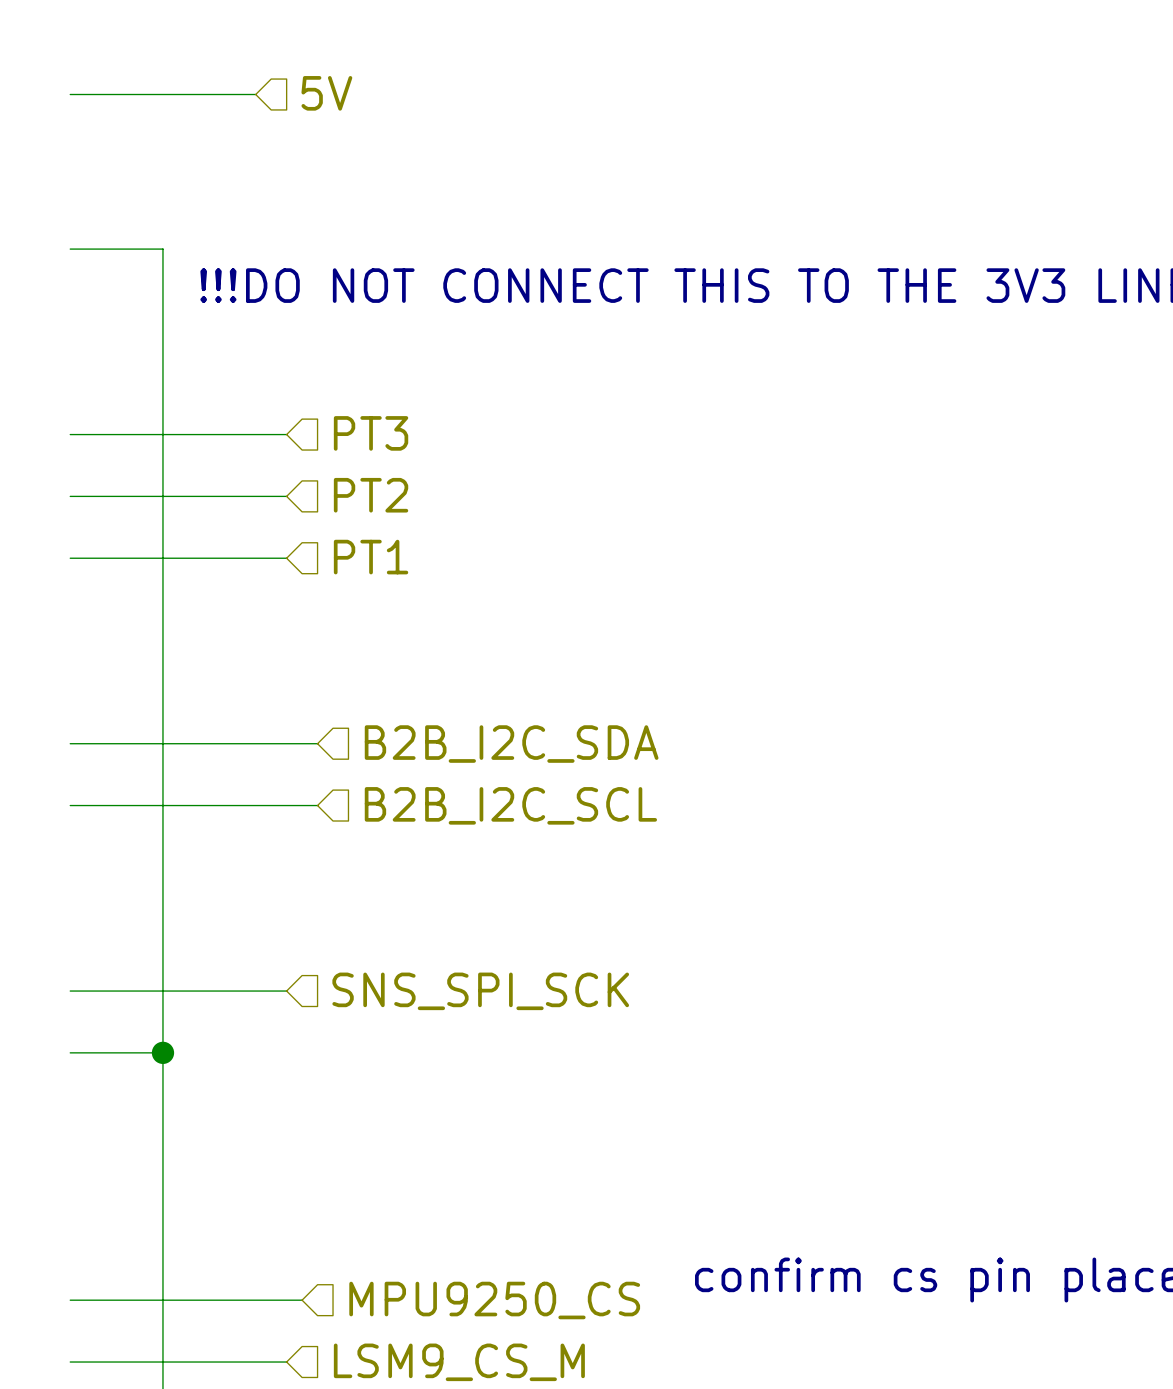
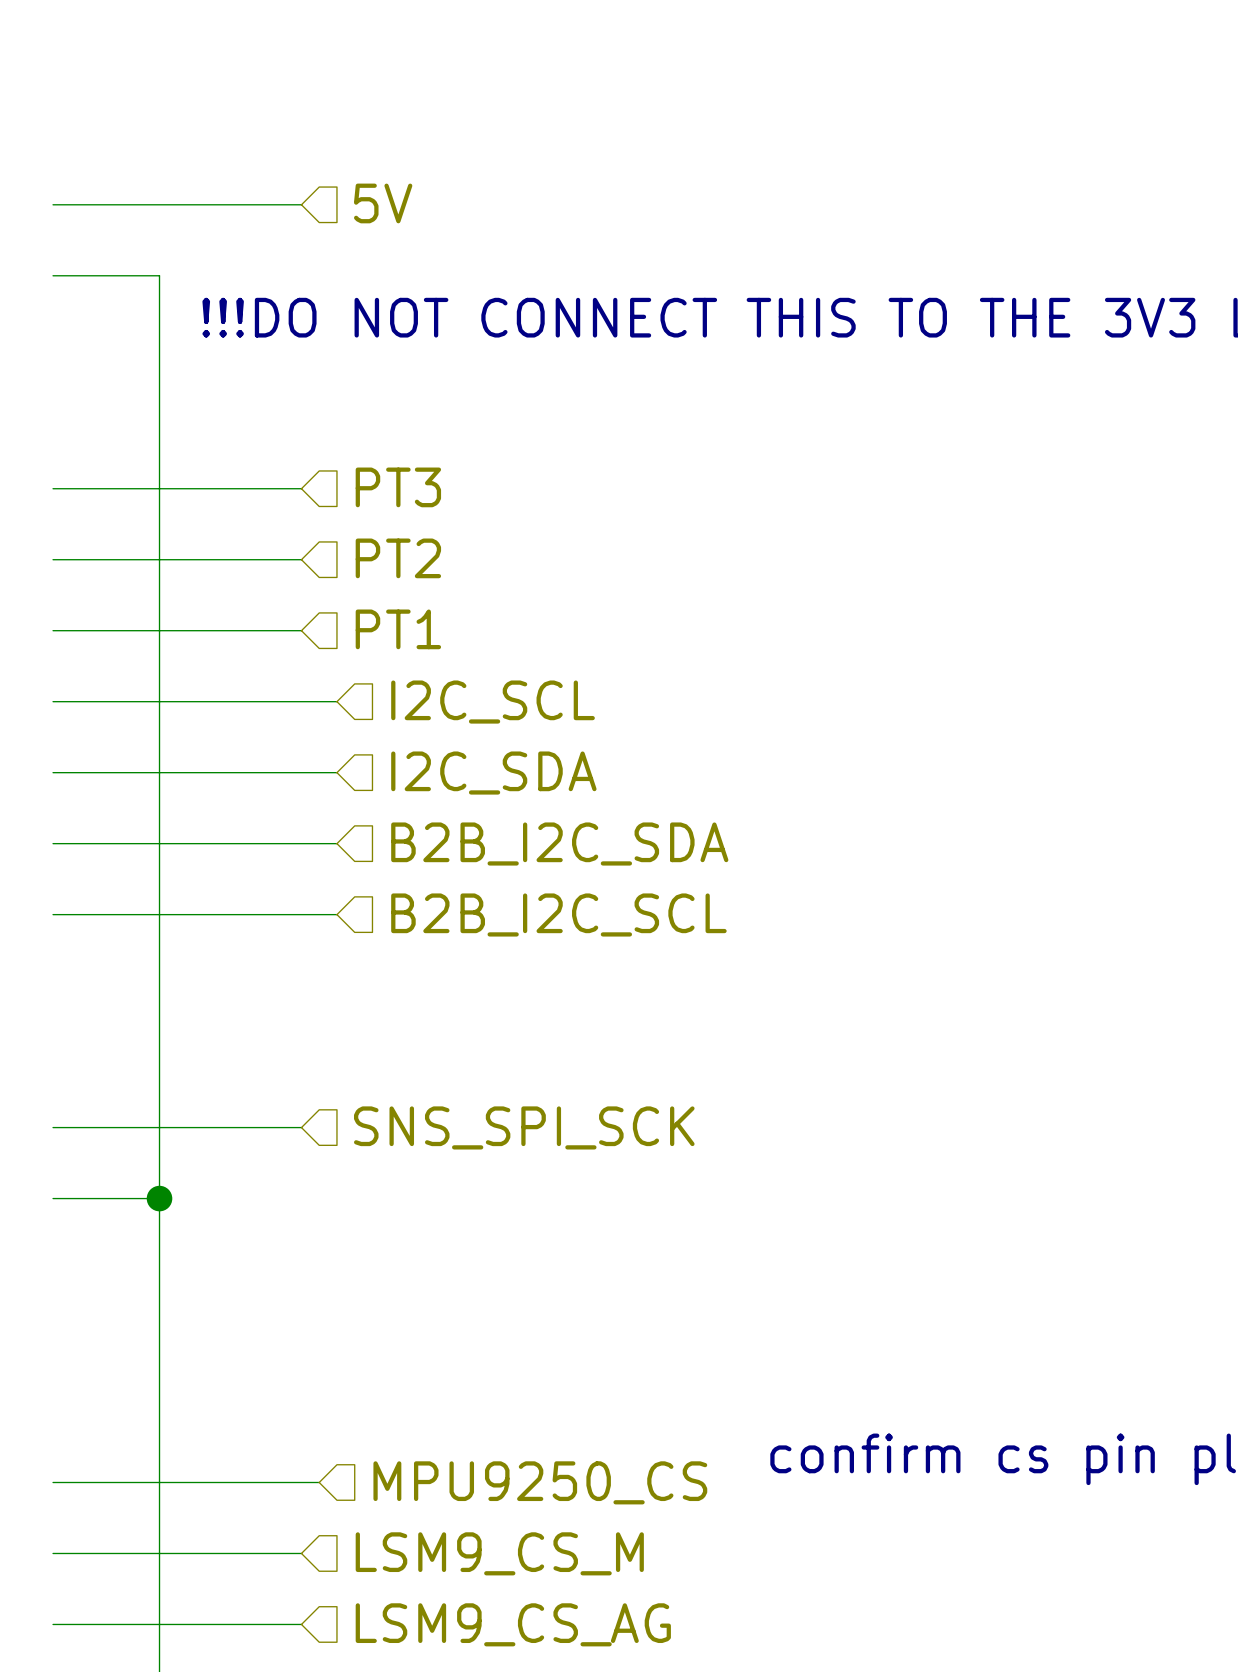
hierarchical label position: 5V (326, 93) -> 5V (383, 203)
wire: (70, 94) (255, 94) -> none
wire: none -> (53, 204) (301, 204)
wire: none -> (53, 701) (336, 701)
hierarchical label: none -> I2C_SCL (493, 702)
wire: none -> (53, 772) (336, 772)
hierarchical label: none -> I2C_SDA (493, 773)

